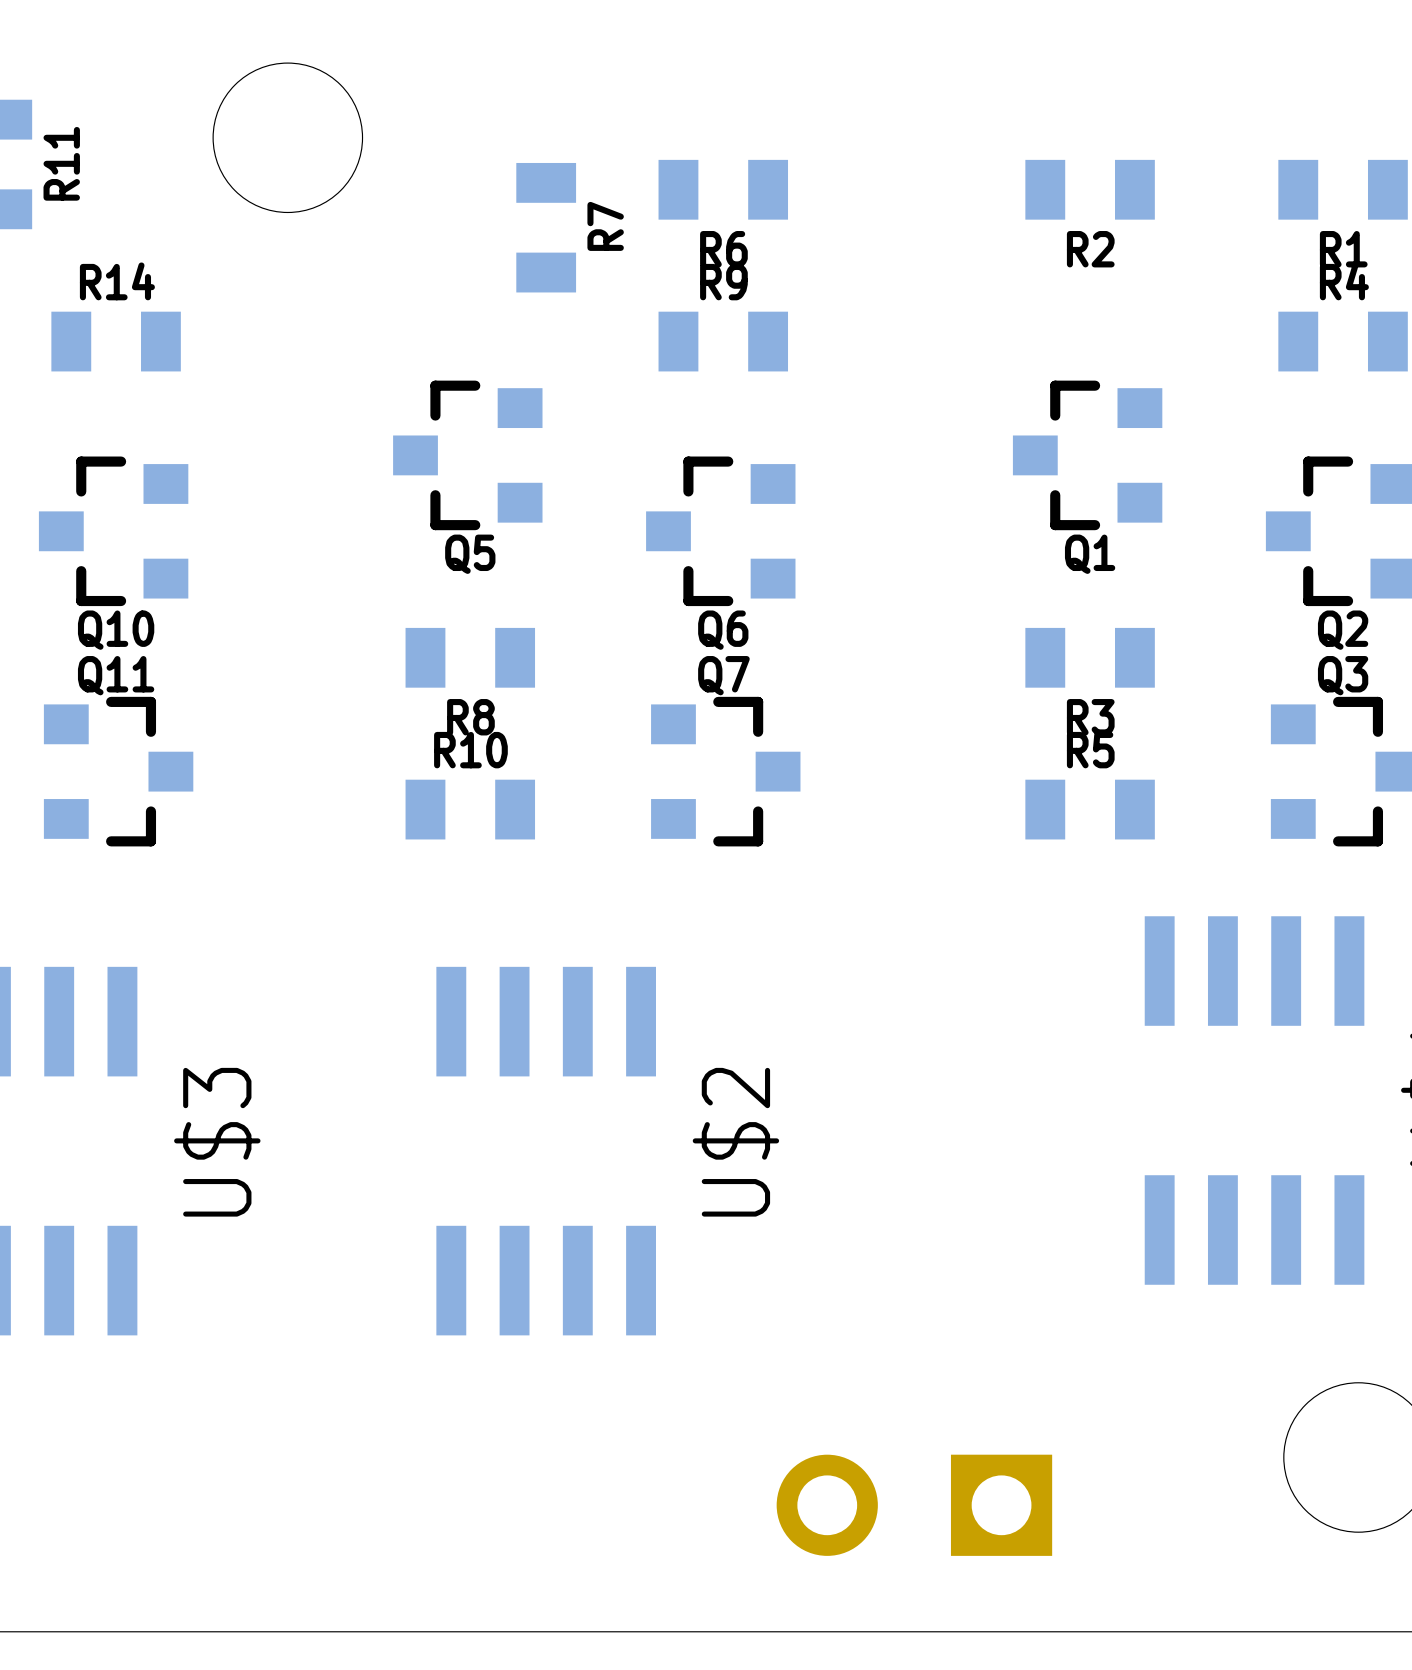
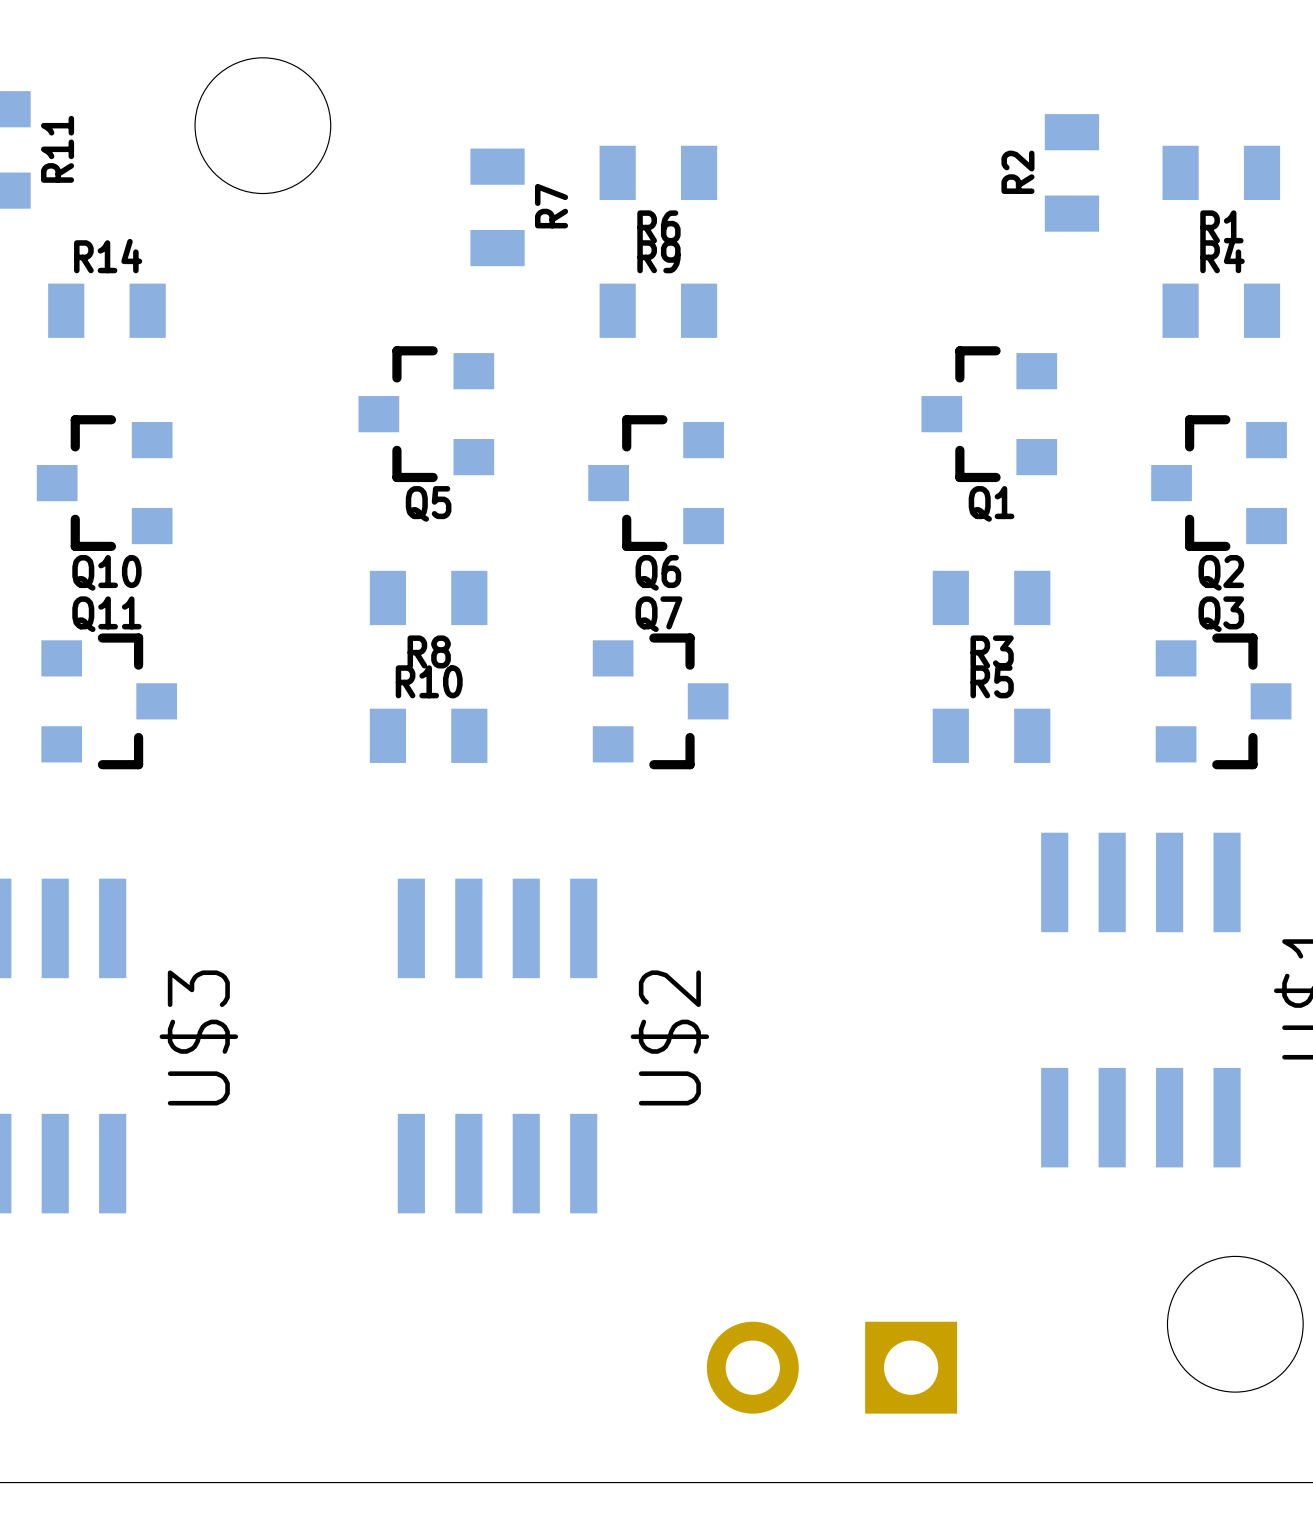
R2 rotation: 0° (1090, 189) -> 90° clockwise (1071, 172)
R2 position: (1090, 189) -> (1071, 172)

